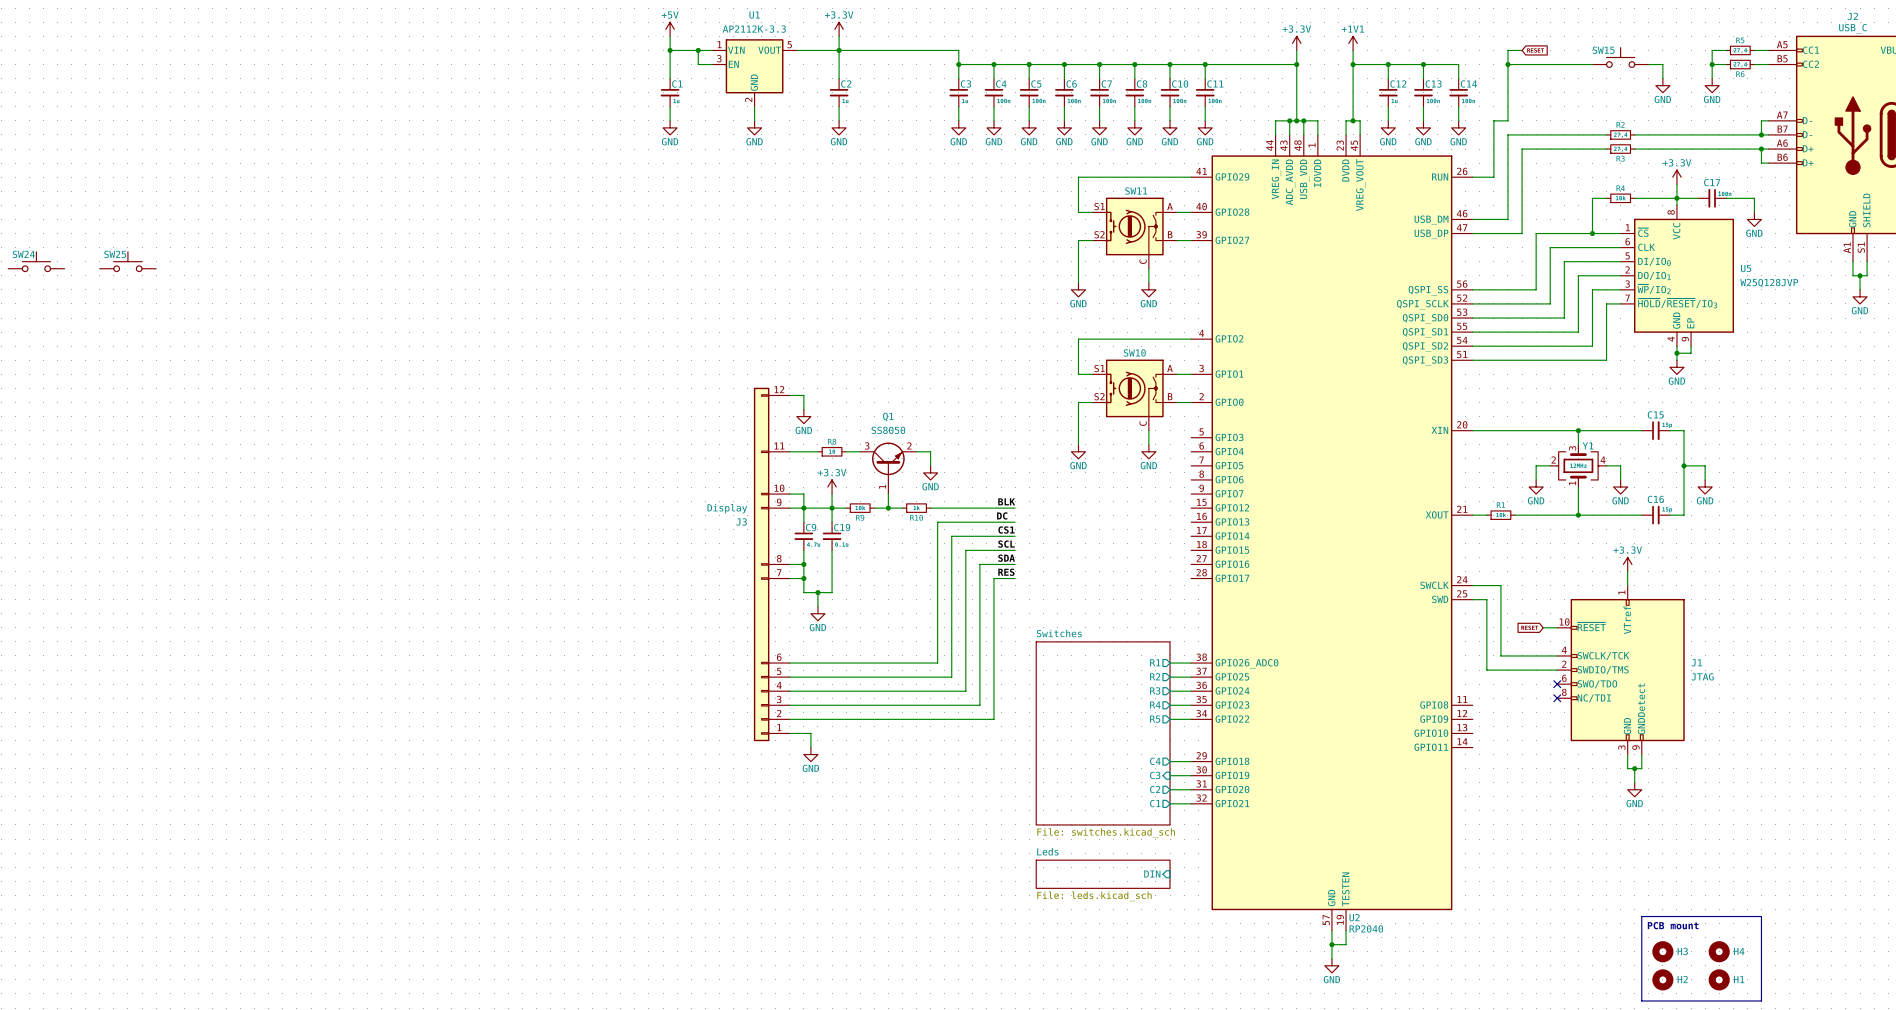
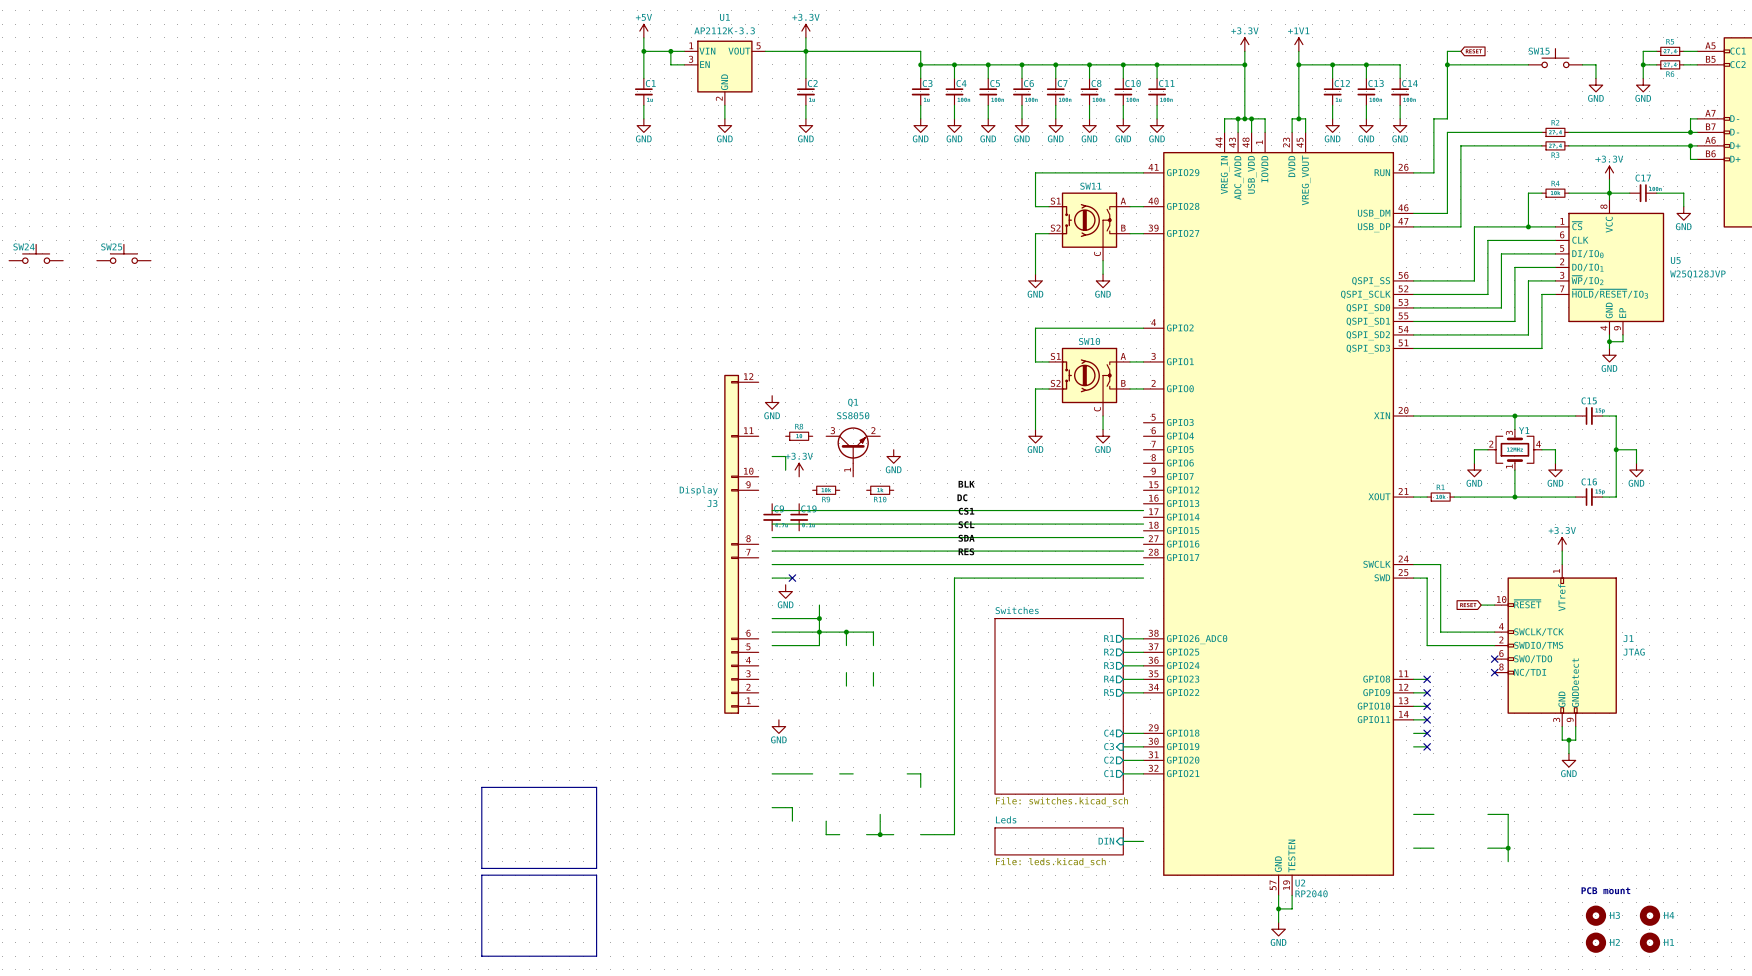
wire: (789, 395) (803, 395) (803, 409) -> (772, 456) (785, 456) (785, 470)
wire: (789, 451) (817, 451) -> none
wire: (846, 451) (860, 451) -> none
wire: (916, 451) (930, 451) (930, 465) -> none
wire: (789, 494) (803, 494) (803, 522) -> none
wire: (832, 494) (832, 522) -> none
wire: (888, 494) (888, 508) -> none
wire: (789, 508) (846, 508) -> none
junction: (803, 508) -> none
junction: (832, 508) -> none
wire: (874, 508) (902, 508) -> none
junction: (888, 508) -> none
wire: (930, 508) (1015, 508) -> none
wire: (1015, 522) (937, 522) (937, 663) (789, 663) -> none
wire: none -> (772, 510) (1143, 510)
wire: (1015, 536) (951, 536) (951, 677) (789, 677) -> none
wire: none -> (772, 524) (1143, 524)
wire: (803, 550) (803, 592) (832, 592) (832, 550) -> none
wire: (1015, 550) (965, 550) (965, 691) (789, 691) -> none
wire: none -> (772, 537) (1143, 537)
wire: (789, 564) (803, 564) -> none
junction: (803, 564) -> none
wire: (1015, 564) (979, 564) (979, 705) (789, 705) -> none
wire: none -> (772, 551) (1143, 551)
wire: (789, 578) (803, 578) -> none
junction: (803, 578) -> none
wire: (1015, 578) (993, 578) (993, 599) -> (1143, 578) (954, 578)
wire: none -> (772, 564) (1143, 564)
wire: (817, 592) (817, 606) -> (846, 632) (846, 645)
junction: (817, 592) -> none
wire: none -> (772, 578) (792, 578)
no-connect mark: none -> (792, 578)
wire: none -> (819, 605) (819, 645) (772, 645)
wire: none -> (772, 618) (819, 618)
junction: none -> (819, 618)
wire: none -> (772, 632) (873, 632) (873, 645)
junction: none -> (819, 632)
junction: none -> (846, 632)
wire: none -> (846, 672) (846, 686)
wire: none -> (873, 672) (873, 686)
wire: none -> (1413, 679) (1427, 679)
no-connect mark: none -> (1427, 679)
wire: (789, 719) (993, 719) -> (920, 834) (954, 834) (954, 692)
wire: none -> (1413, 692) (1427, 692)
no-connect mark: none -> (1427, 692)
wire: (789, 733) (810, 733) (810, 747) -> (772, 807) (792, 807) (792, 821)
wire: none -> (1413, 706) (1427, 706)
no-connect mark: none -> (1427, 706)
wire: none -> (1413, 719) (1427, 719)
no-connect mark: none -> (1427, 719)
wire: none -> (1413, 733) (1427, 733)
no-connect mark: none -> (1427, 733)
wire: none -> (1413, 746) (1427, 746)
no-connect mark: none -> (1427, 746)
wire: none -> (772, 773) (812, 773)
wire: none -> (839, 773) (853, 773)
wire: none -> (907, 773) (920, 773) (920, 787)
line: none -> (481, 787) (596, 787) (596, 868) (481, 868) (481, 787)
wire: none -> (880, 814) (880, 834)
wire: none -> (1413, 814) (1433, 814)
wire: none -> (1487, 814) (1508, 814) (1508, 861)
wire: none -> (826, 821) (826, 834) (839, 834)
wire: none -> (866, 834) (893, 834)
junction: none -> (880, 834)
wire: none -> (1123, 841) (1143, 841)
wire: none -> (1413, 848) (1433, 848)
wire: none -> (1487, 848) (1508, 848)
junction: none -> (1508, 848)
line: none -> (481, 875) (481, 956) (596, 956) (596, 875) (481, 875)
line: (1641, 916) (1761, 916) (1761, 1001) (1641, 1001) (1641, 916) -> none

